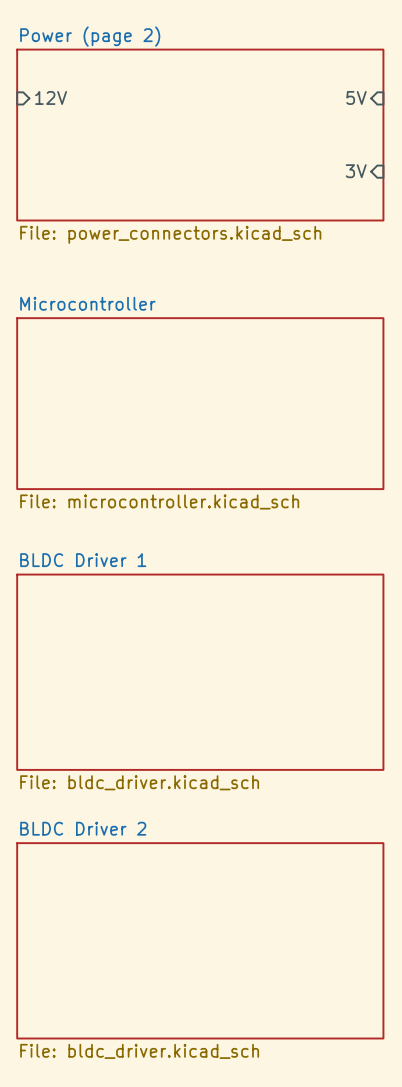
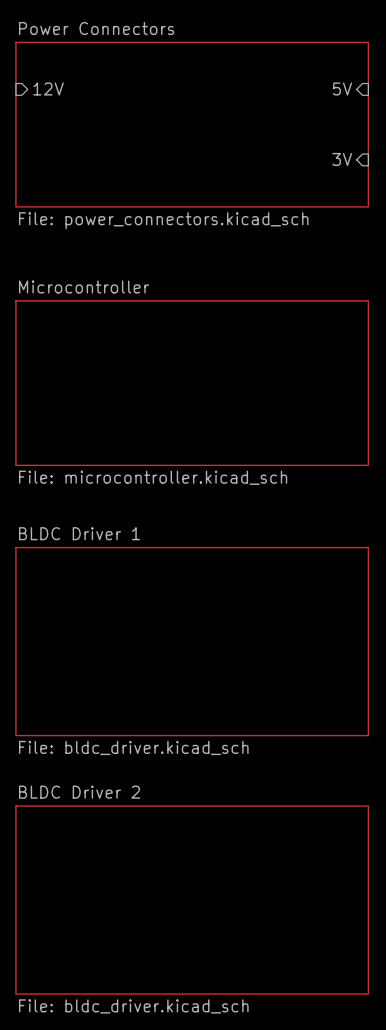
sheet Power (page 2) name: Power (page 2) (90, 36) -> Power Connectors (96, 28)

